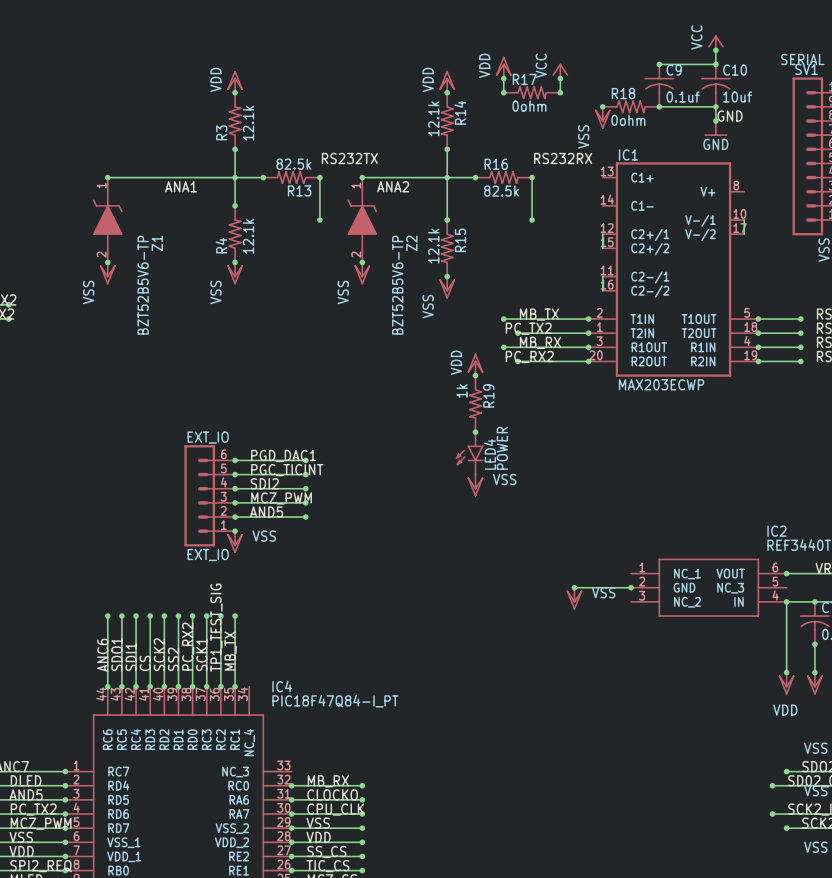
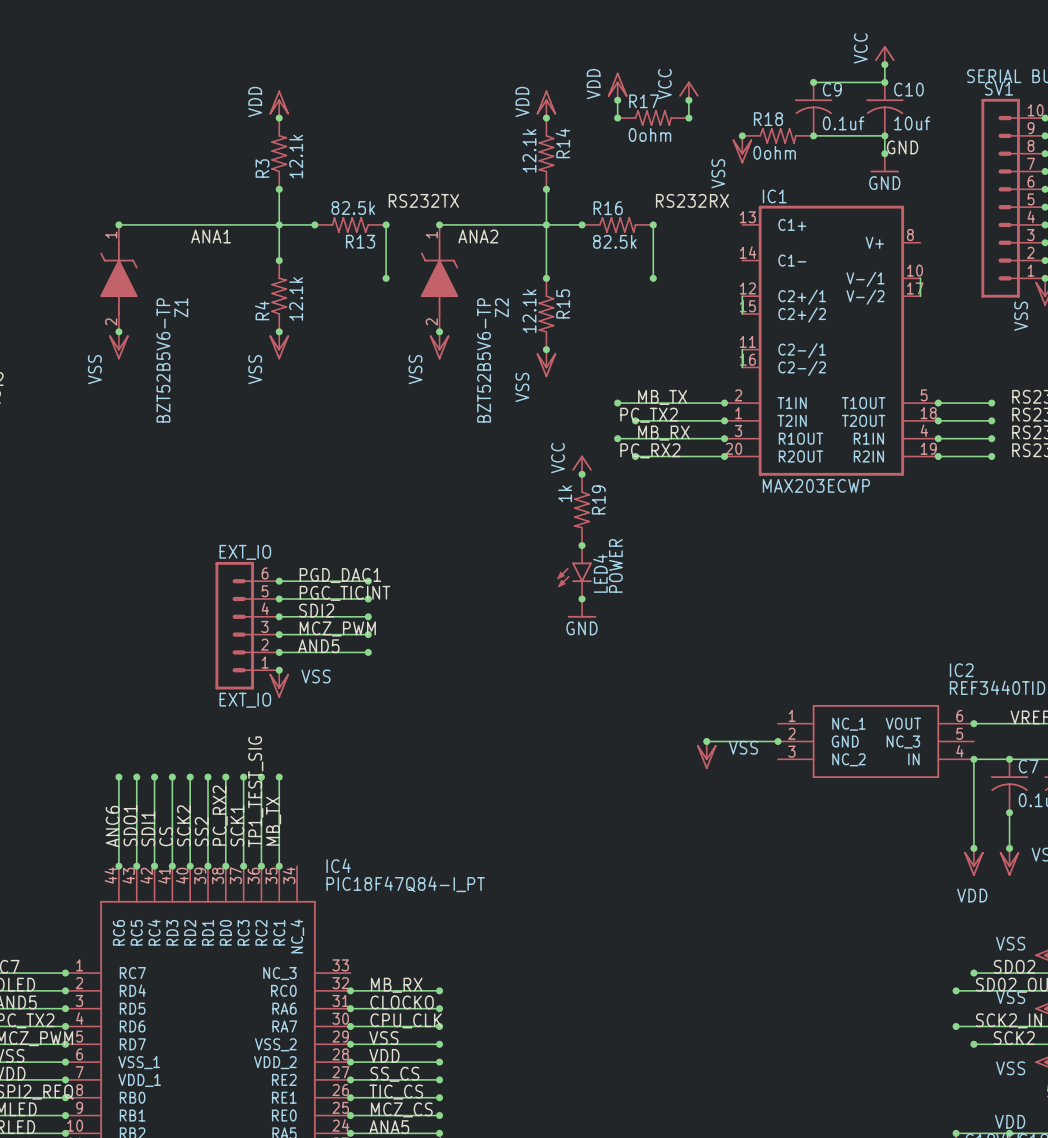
power symbol: VDD (475, 364) -> VCC (582, 464)
junction: none -> (582, 598)
power symbol: VSS (475, 485) -> GND (582, 608)

